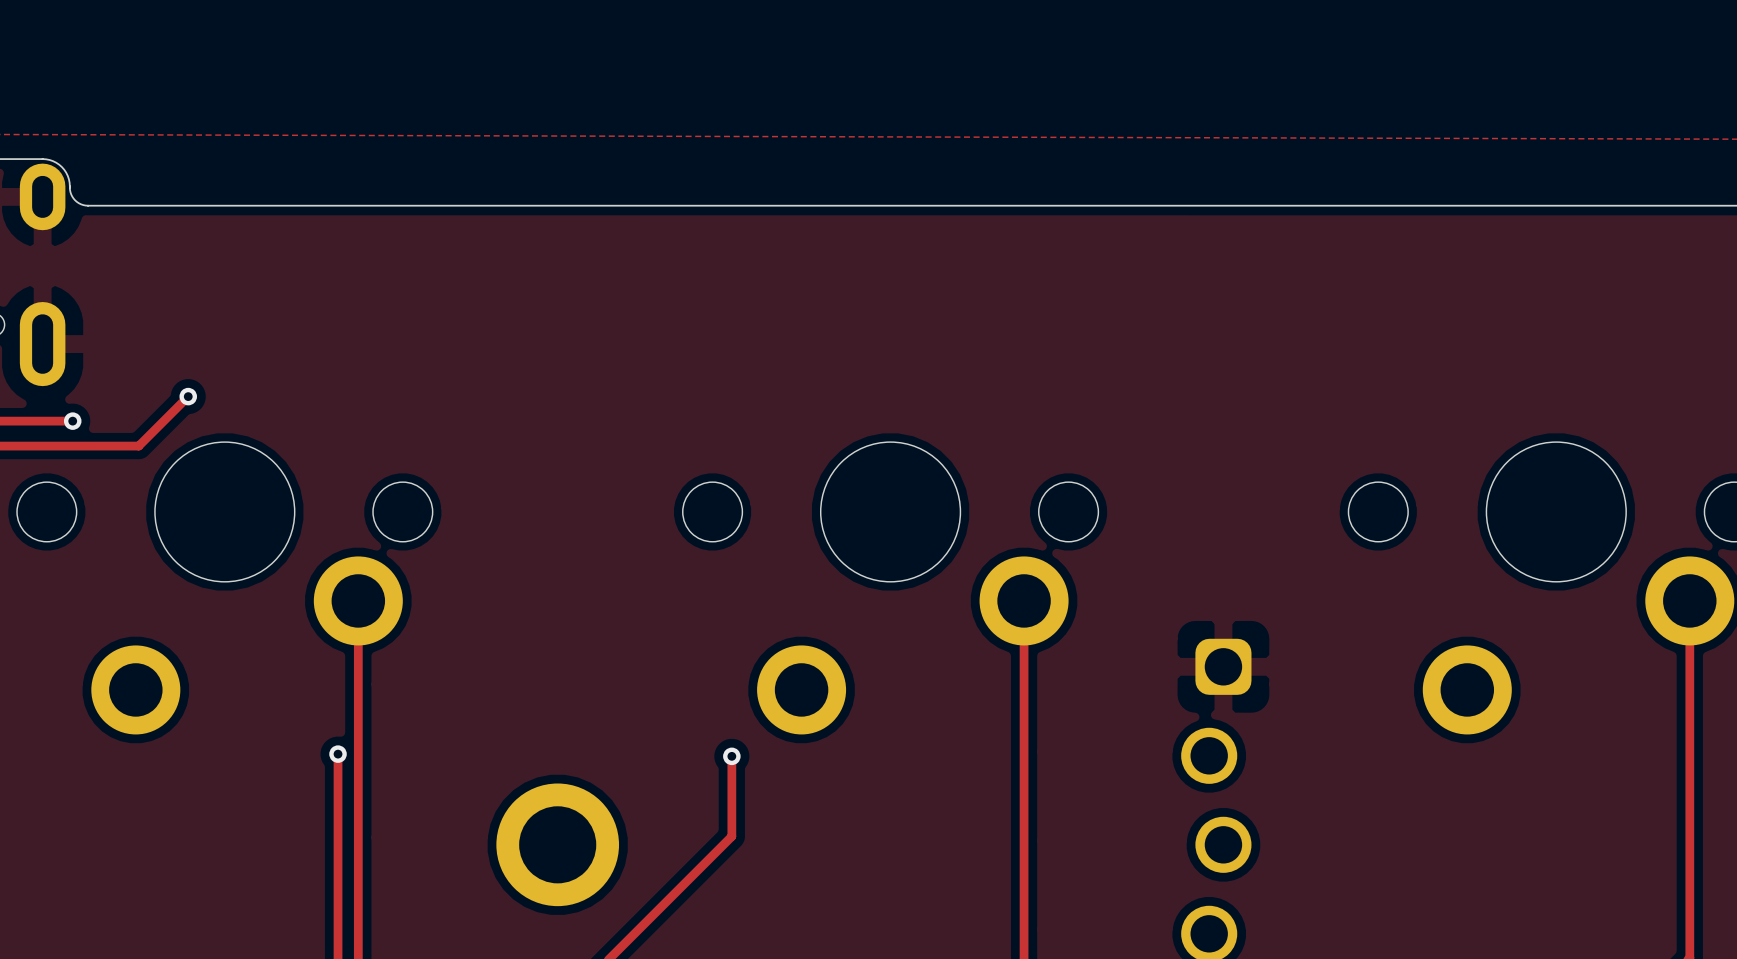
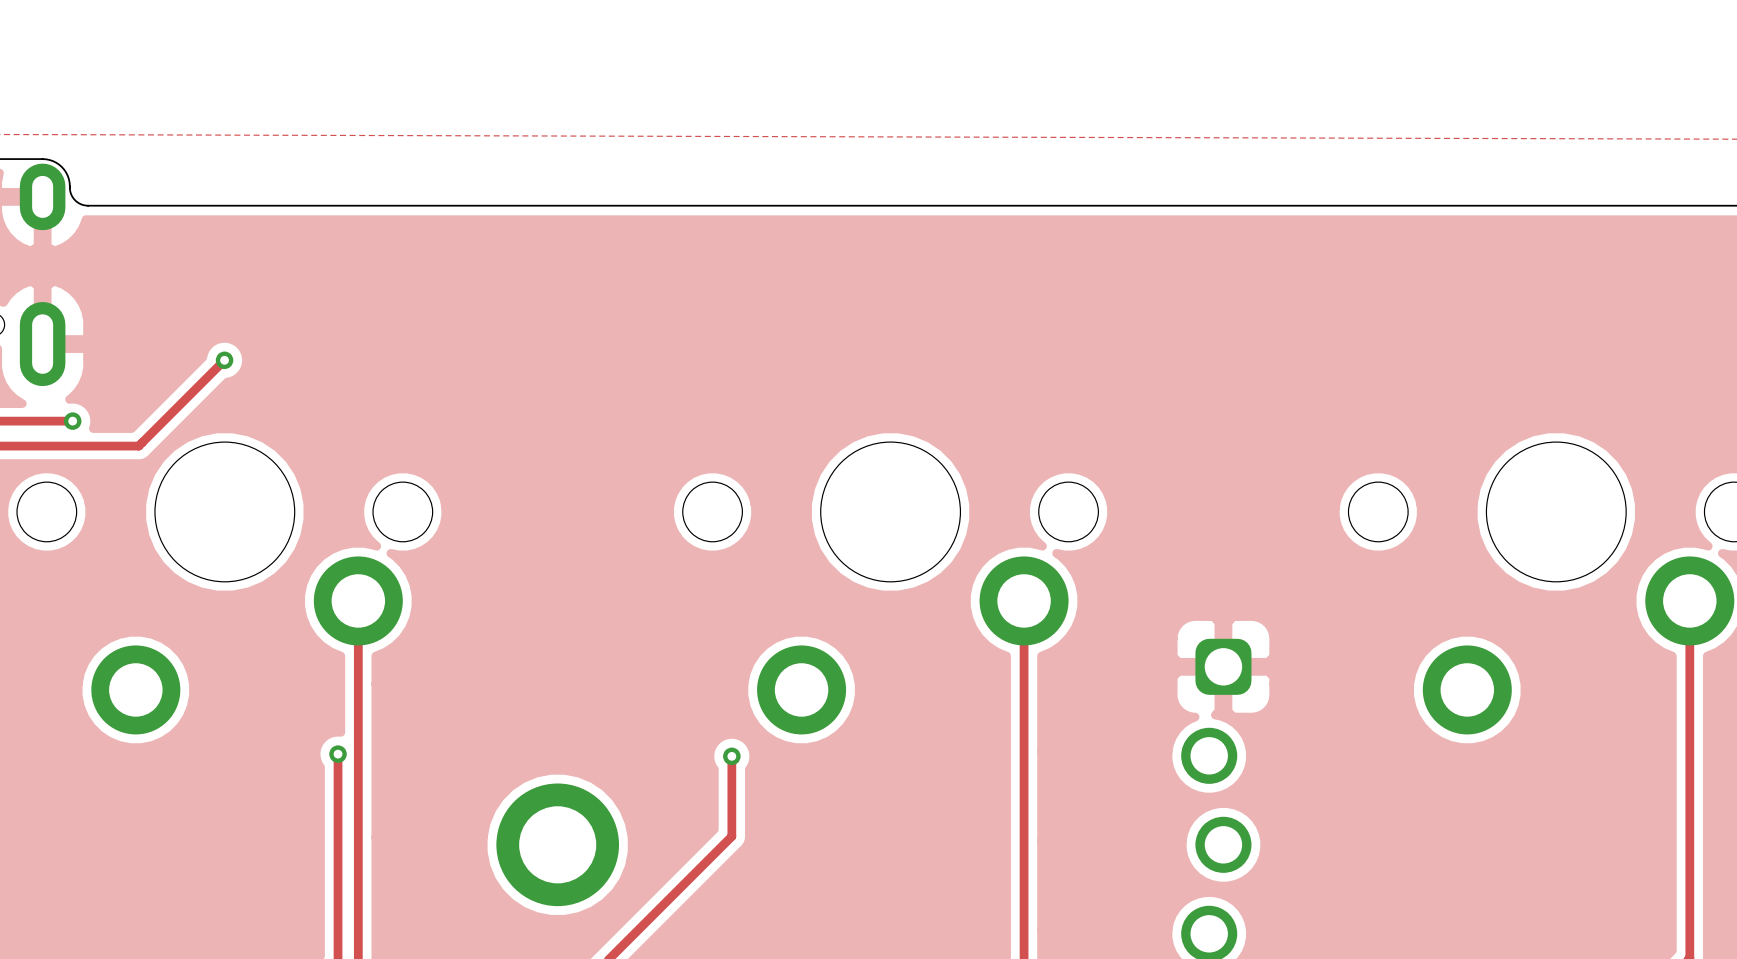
track: none -> (224, 360) (188, 396)
via position: (188, 396) -> (224, 360)

